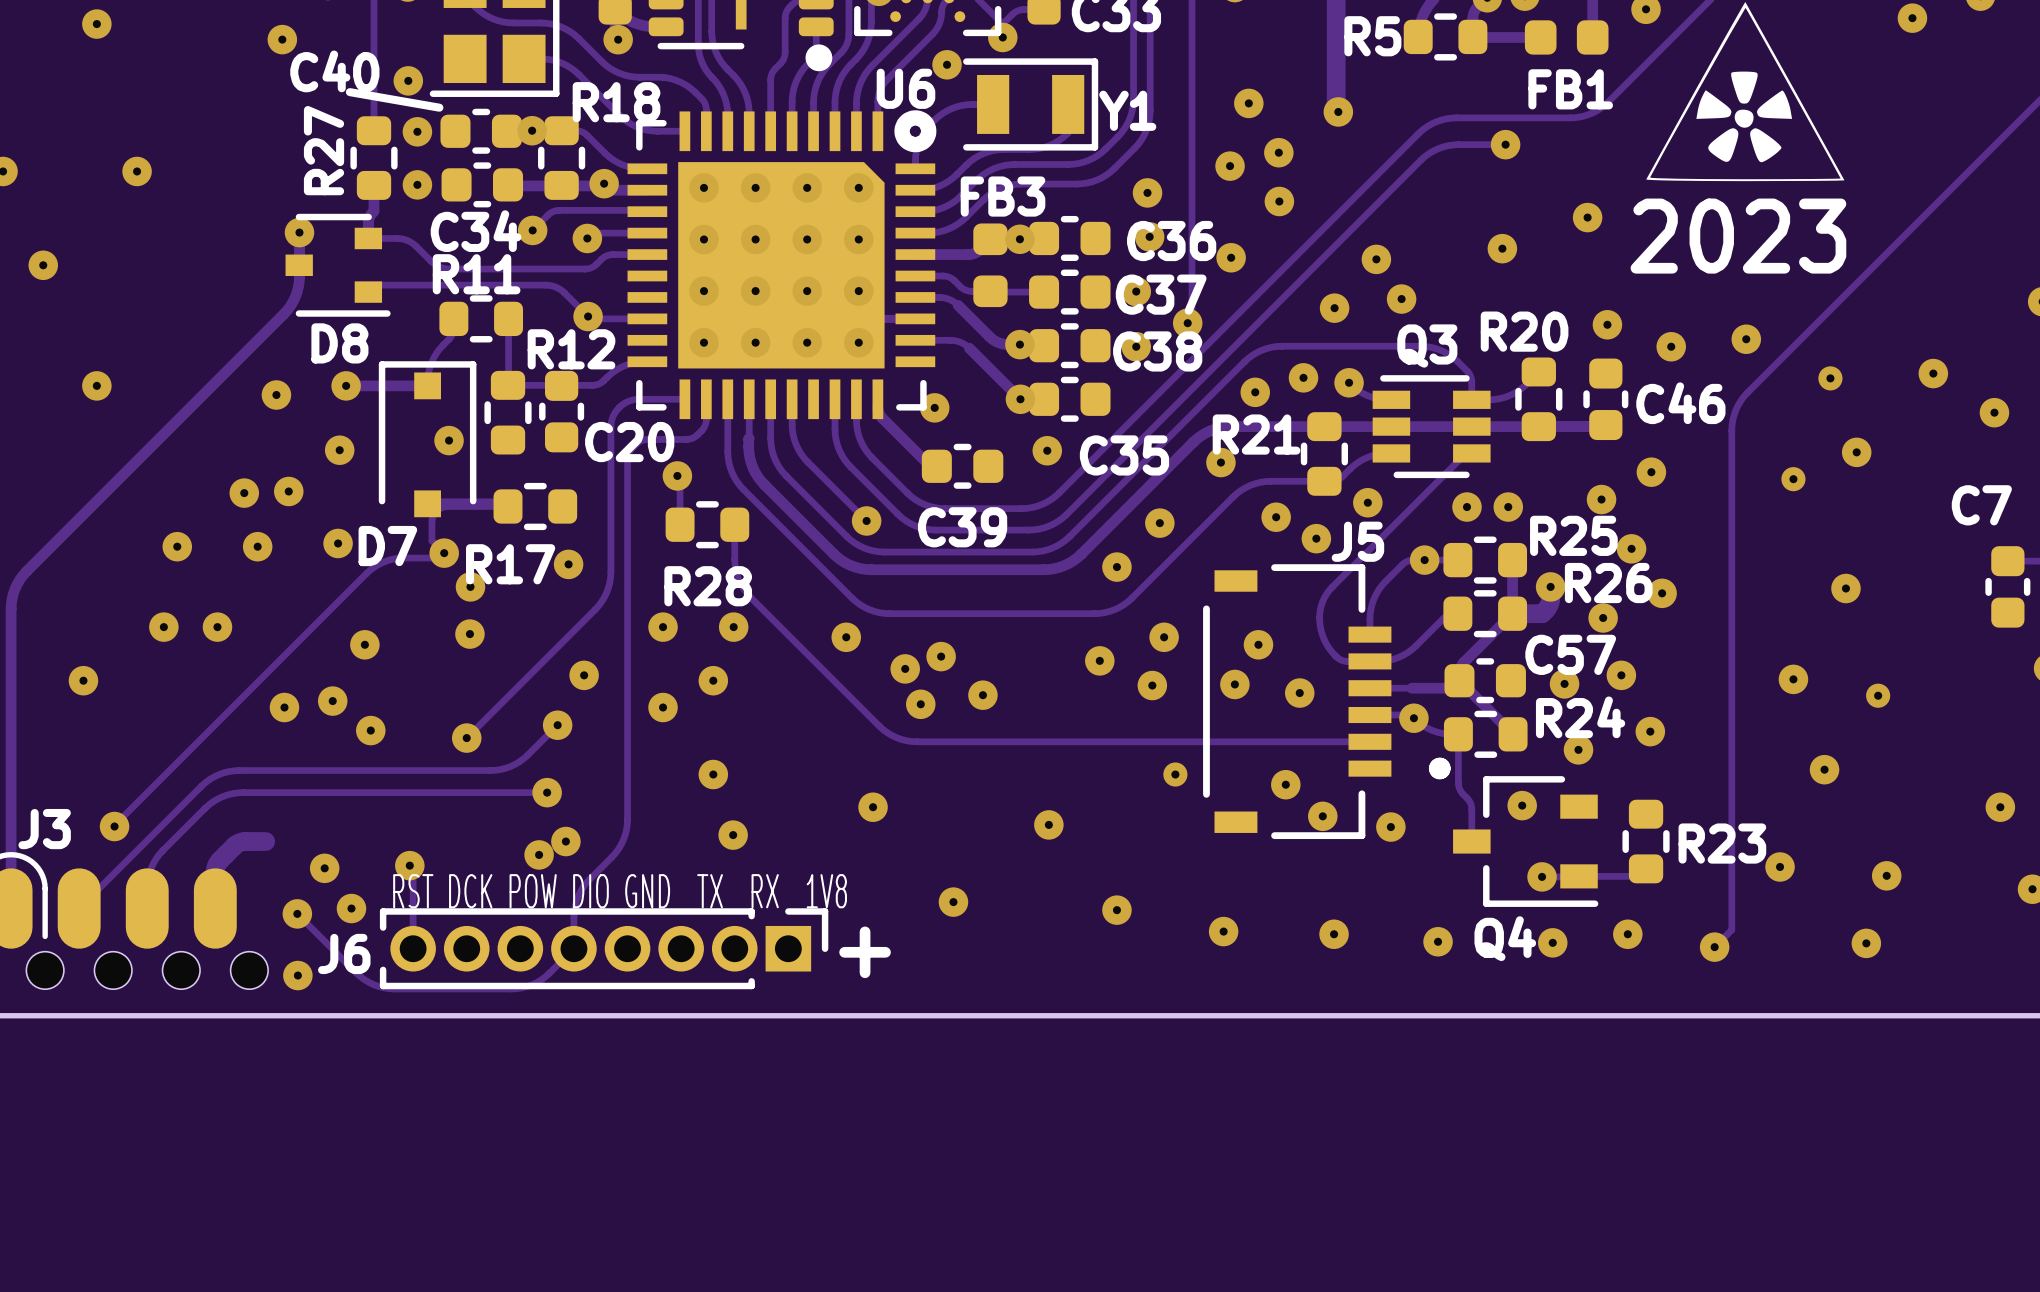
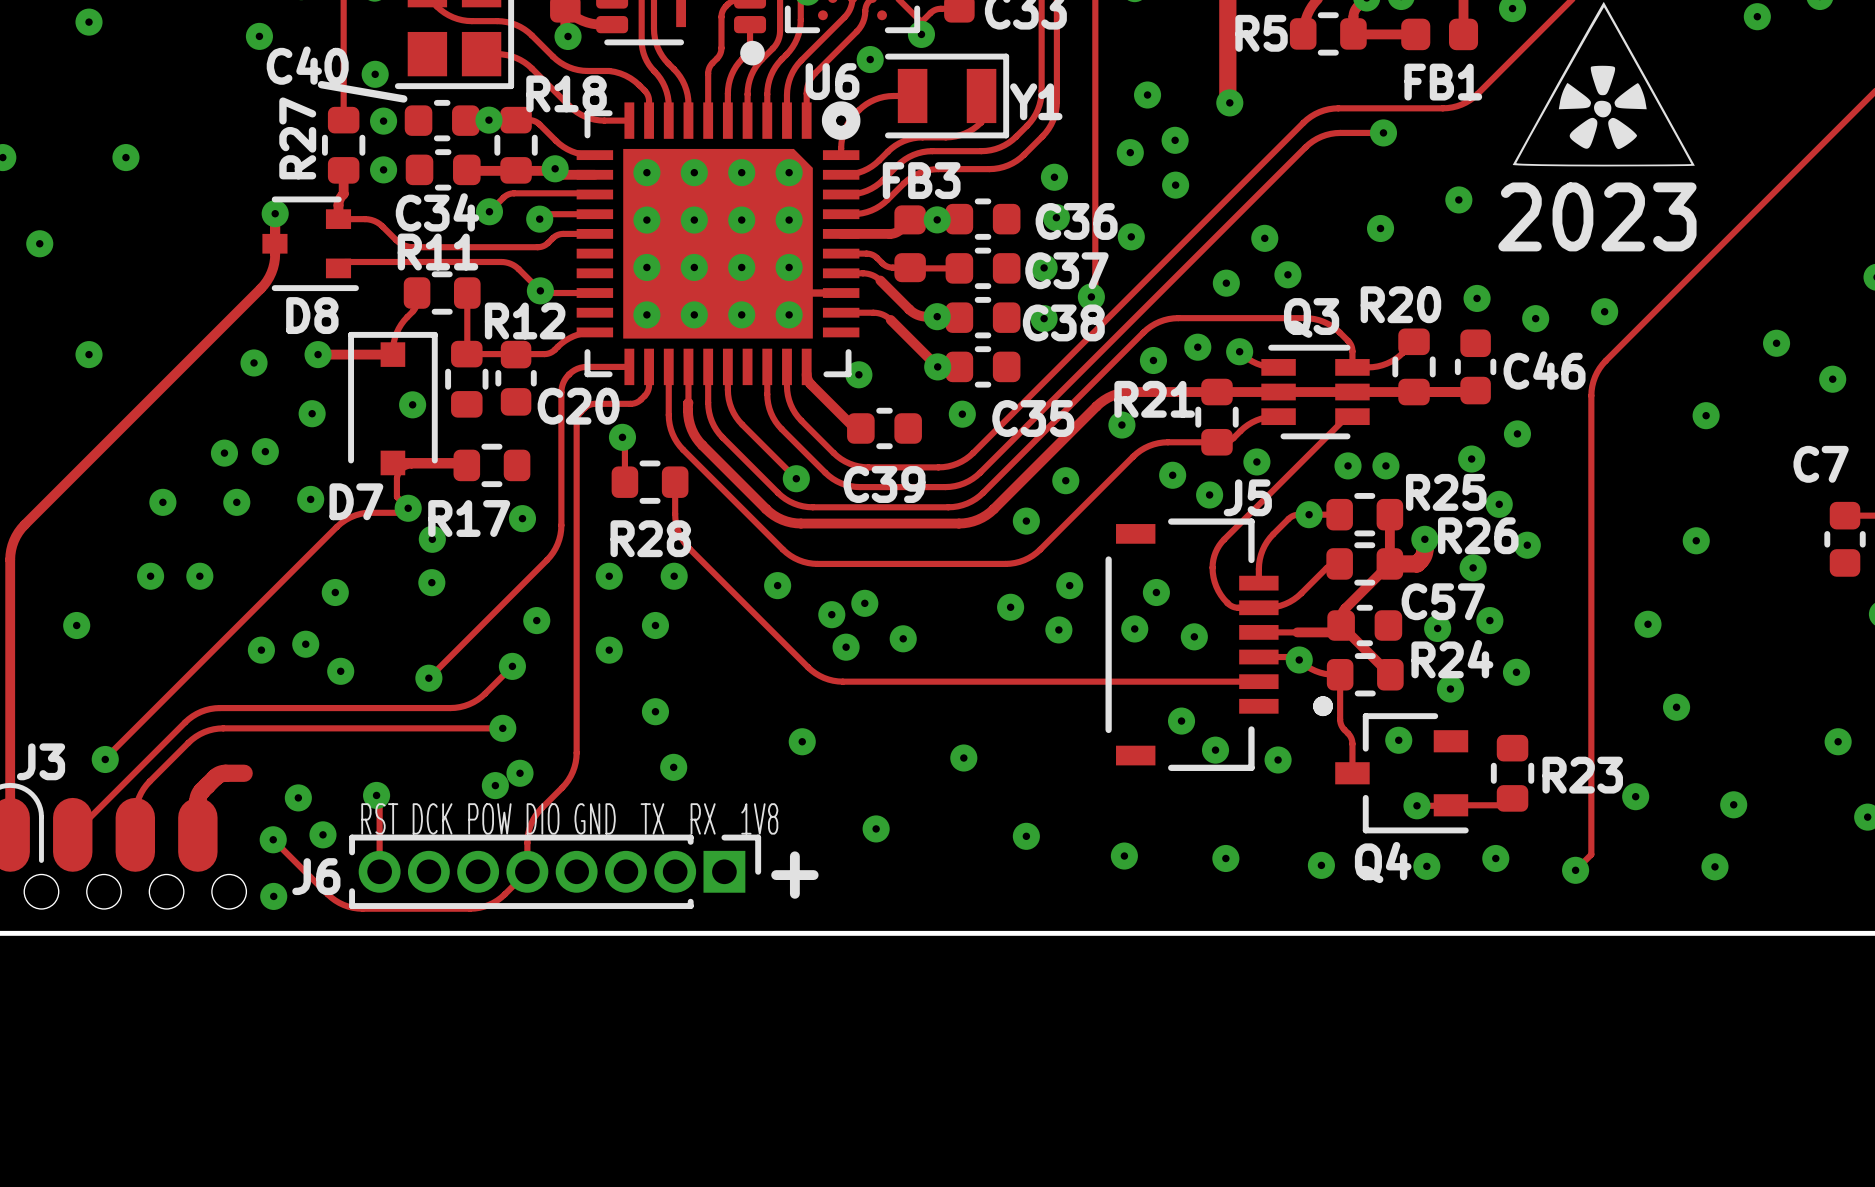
via: (1830, 378) -> none
via: (1793, 479) -> none
via: (1878, 695) -> none
via: (1175, 774) -> none

